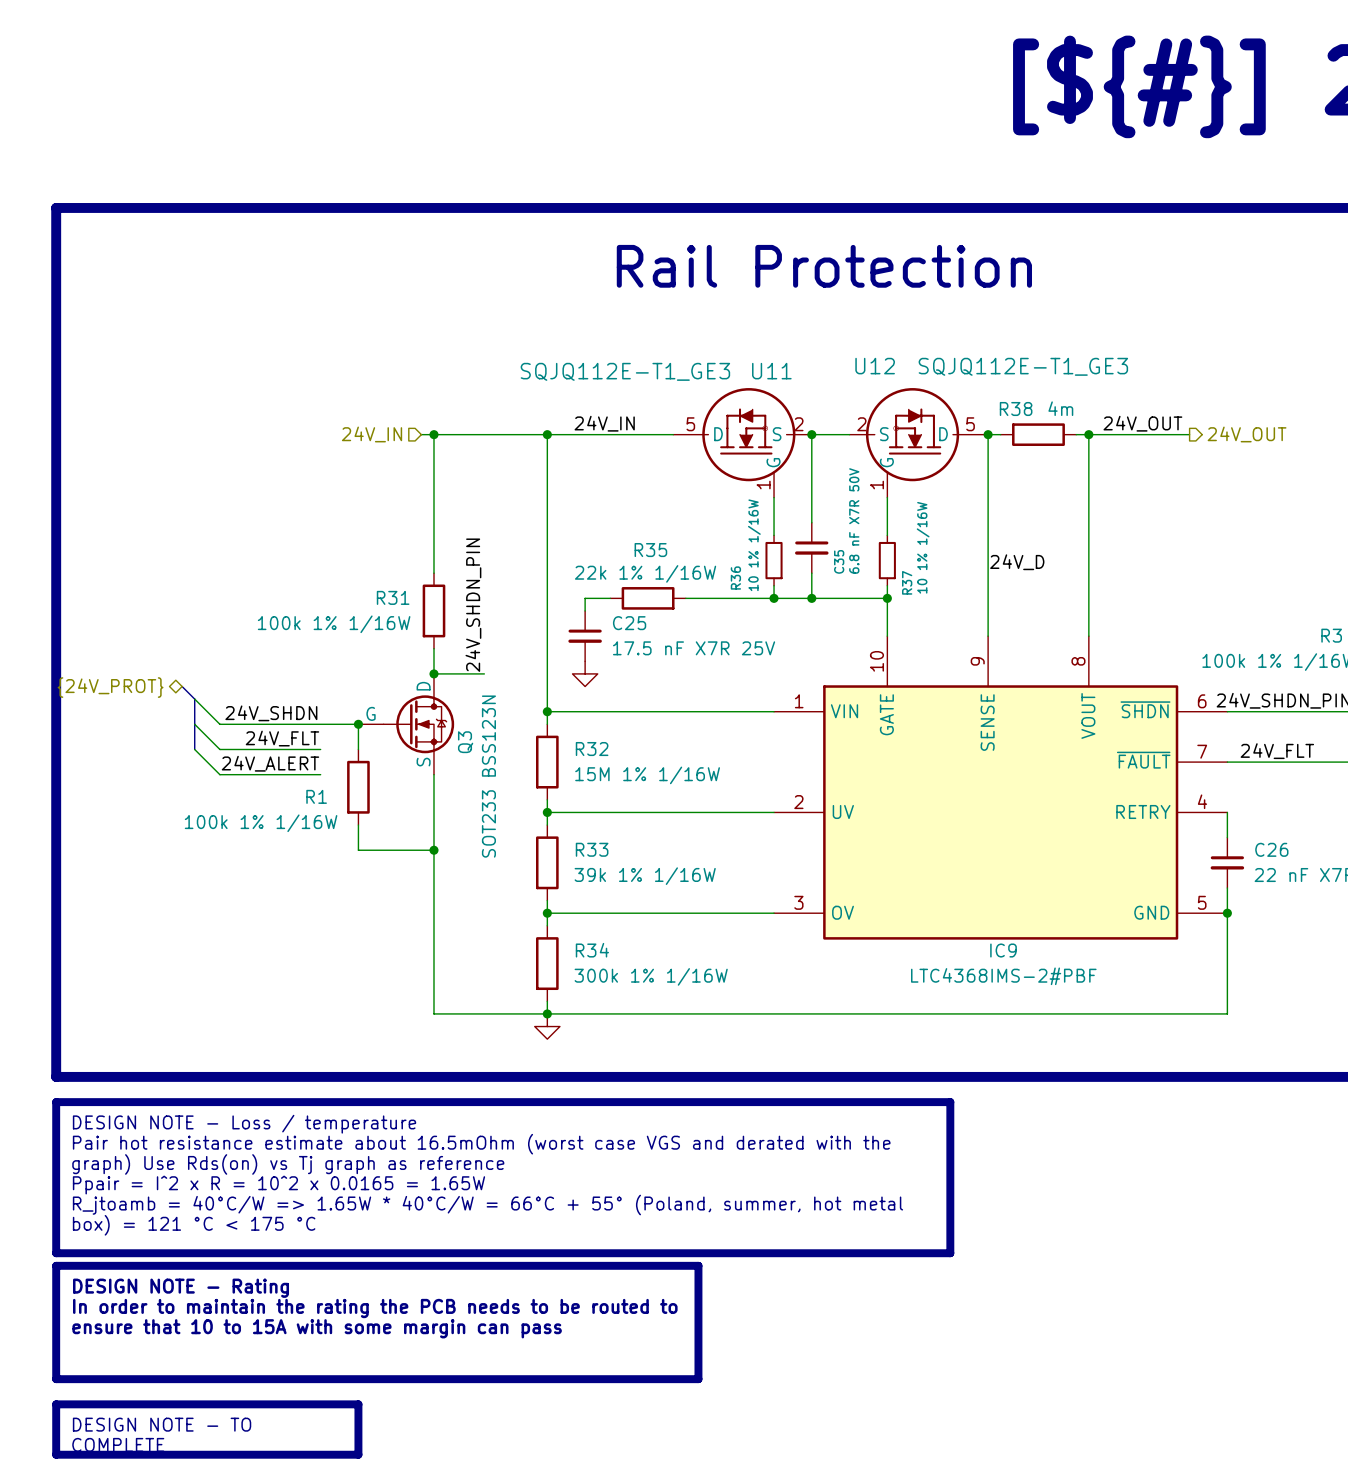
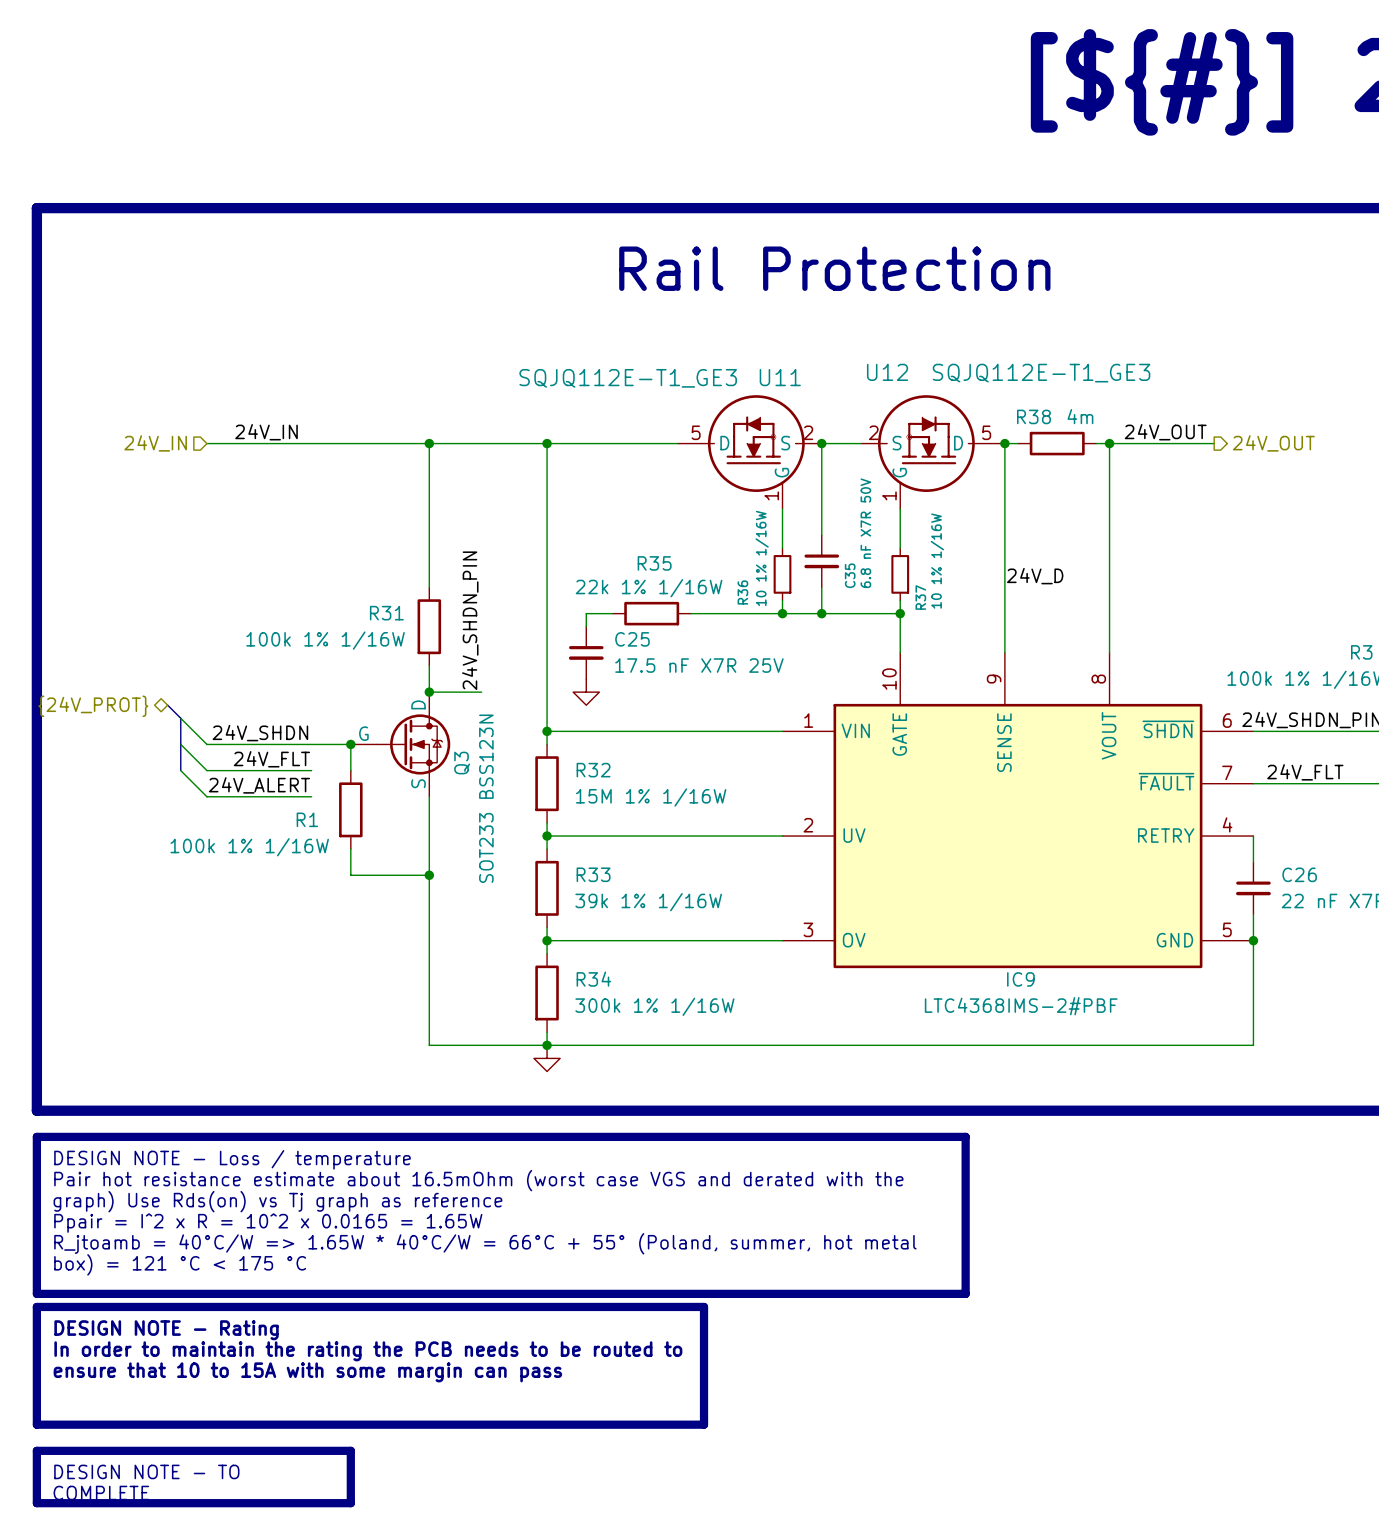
label: none -> 24V_IN (266, 432)
label: 24V_IN (604, 423) -> none
wire: none -> (206, 443) (416, 443)
hierarchical label position: 24V_IN (372, 434) -> 24V_IN (155, 443)

